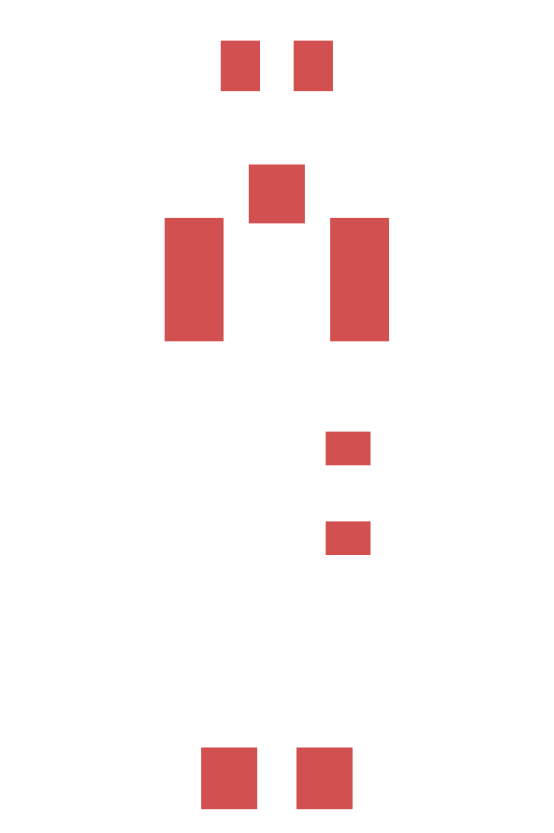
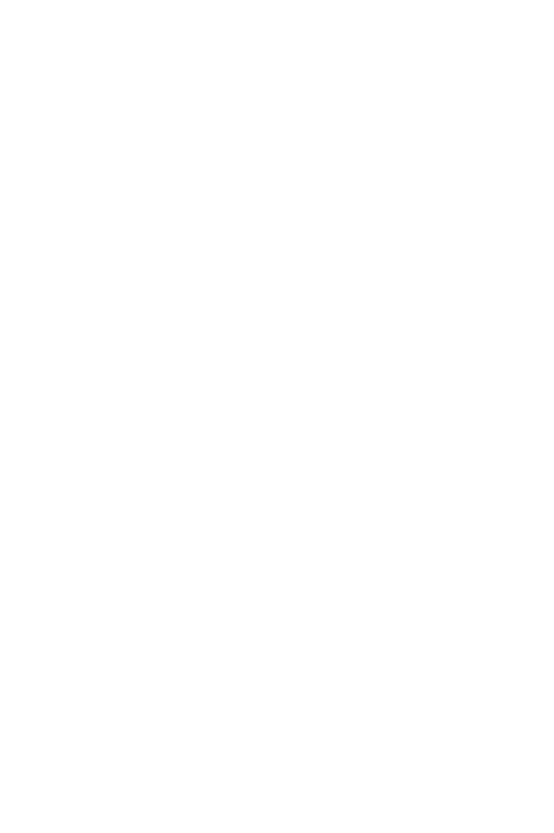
part: (276, 65) -> none
part: (276, 252) -> none
part: (348, 493) -> none
part: (276, 778) -> none

